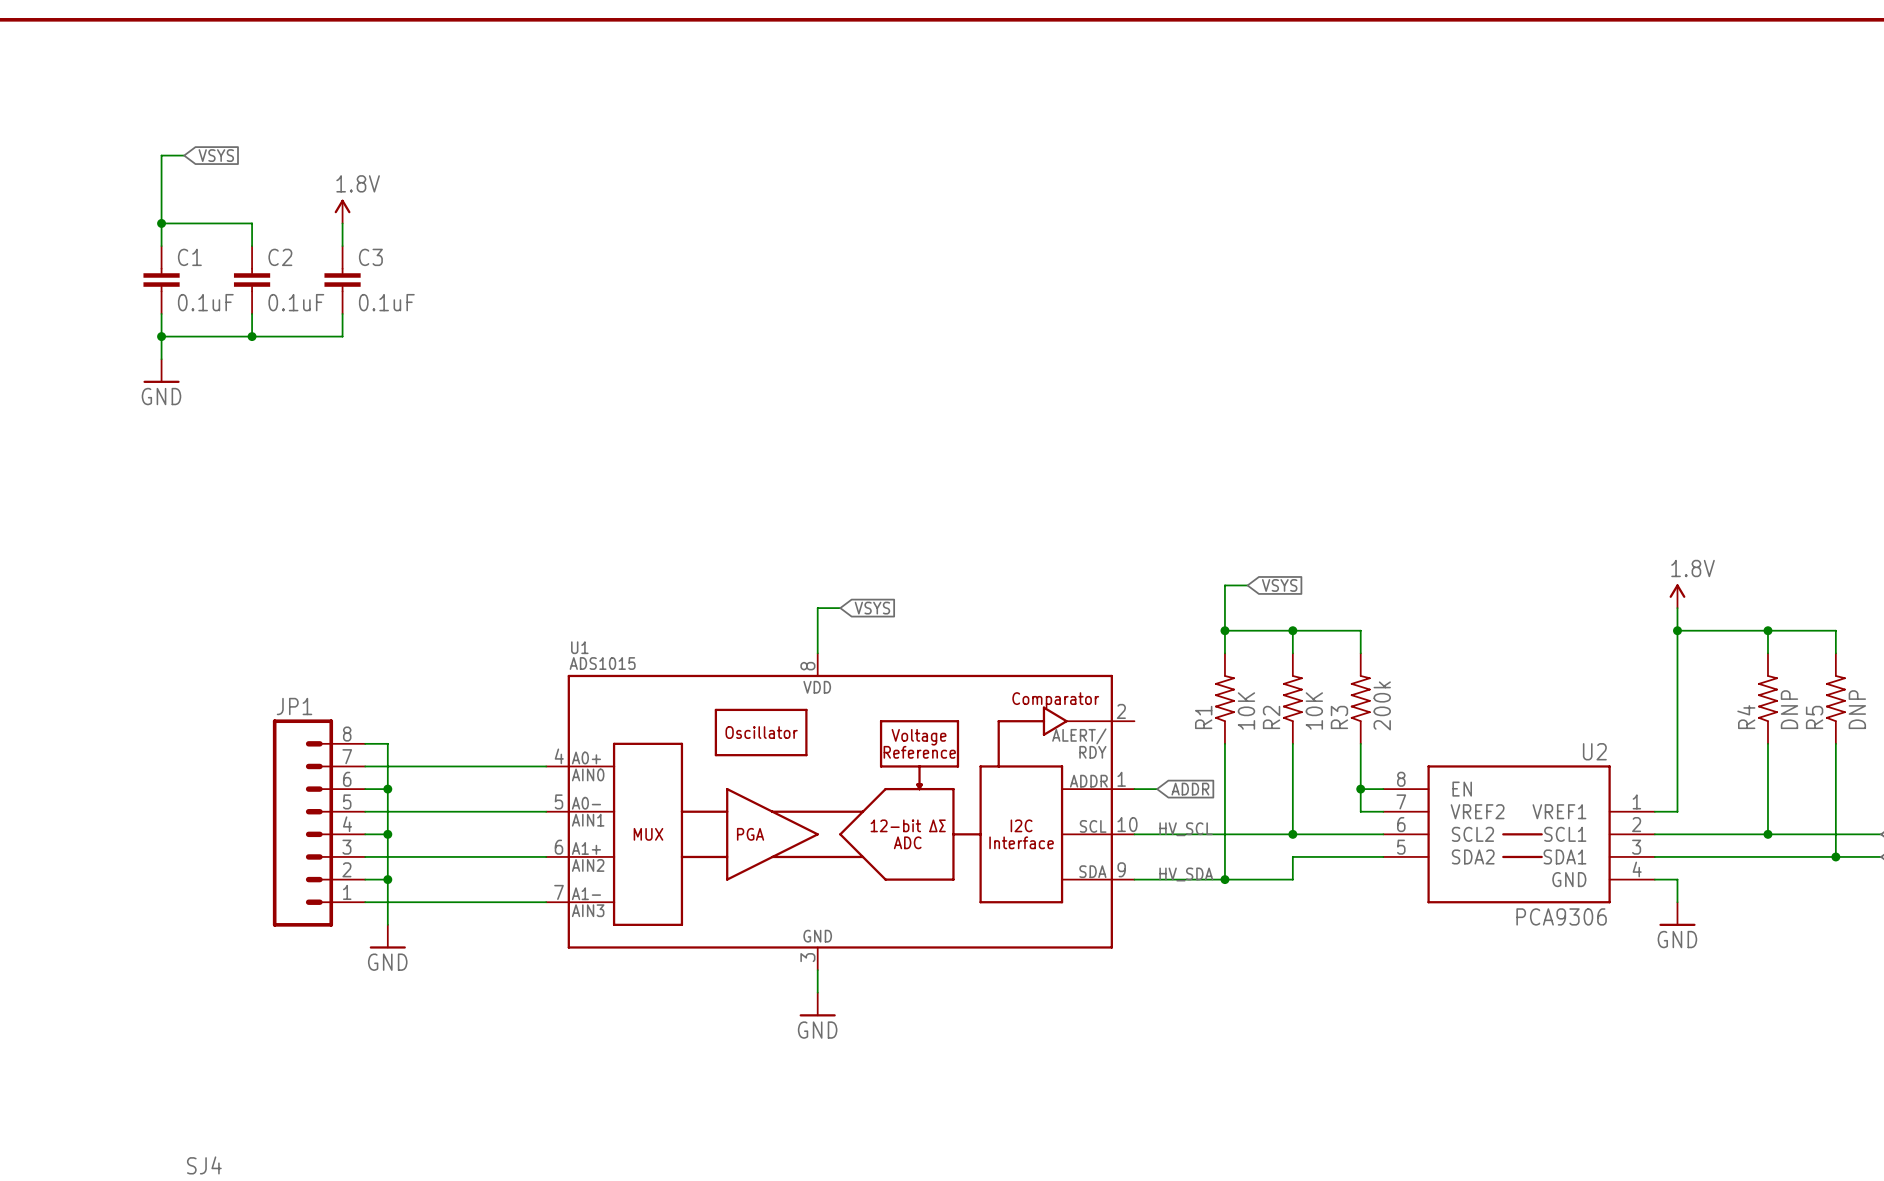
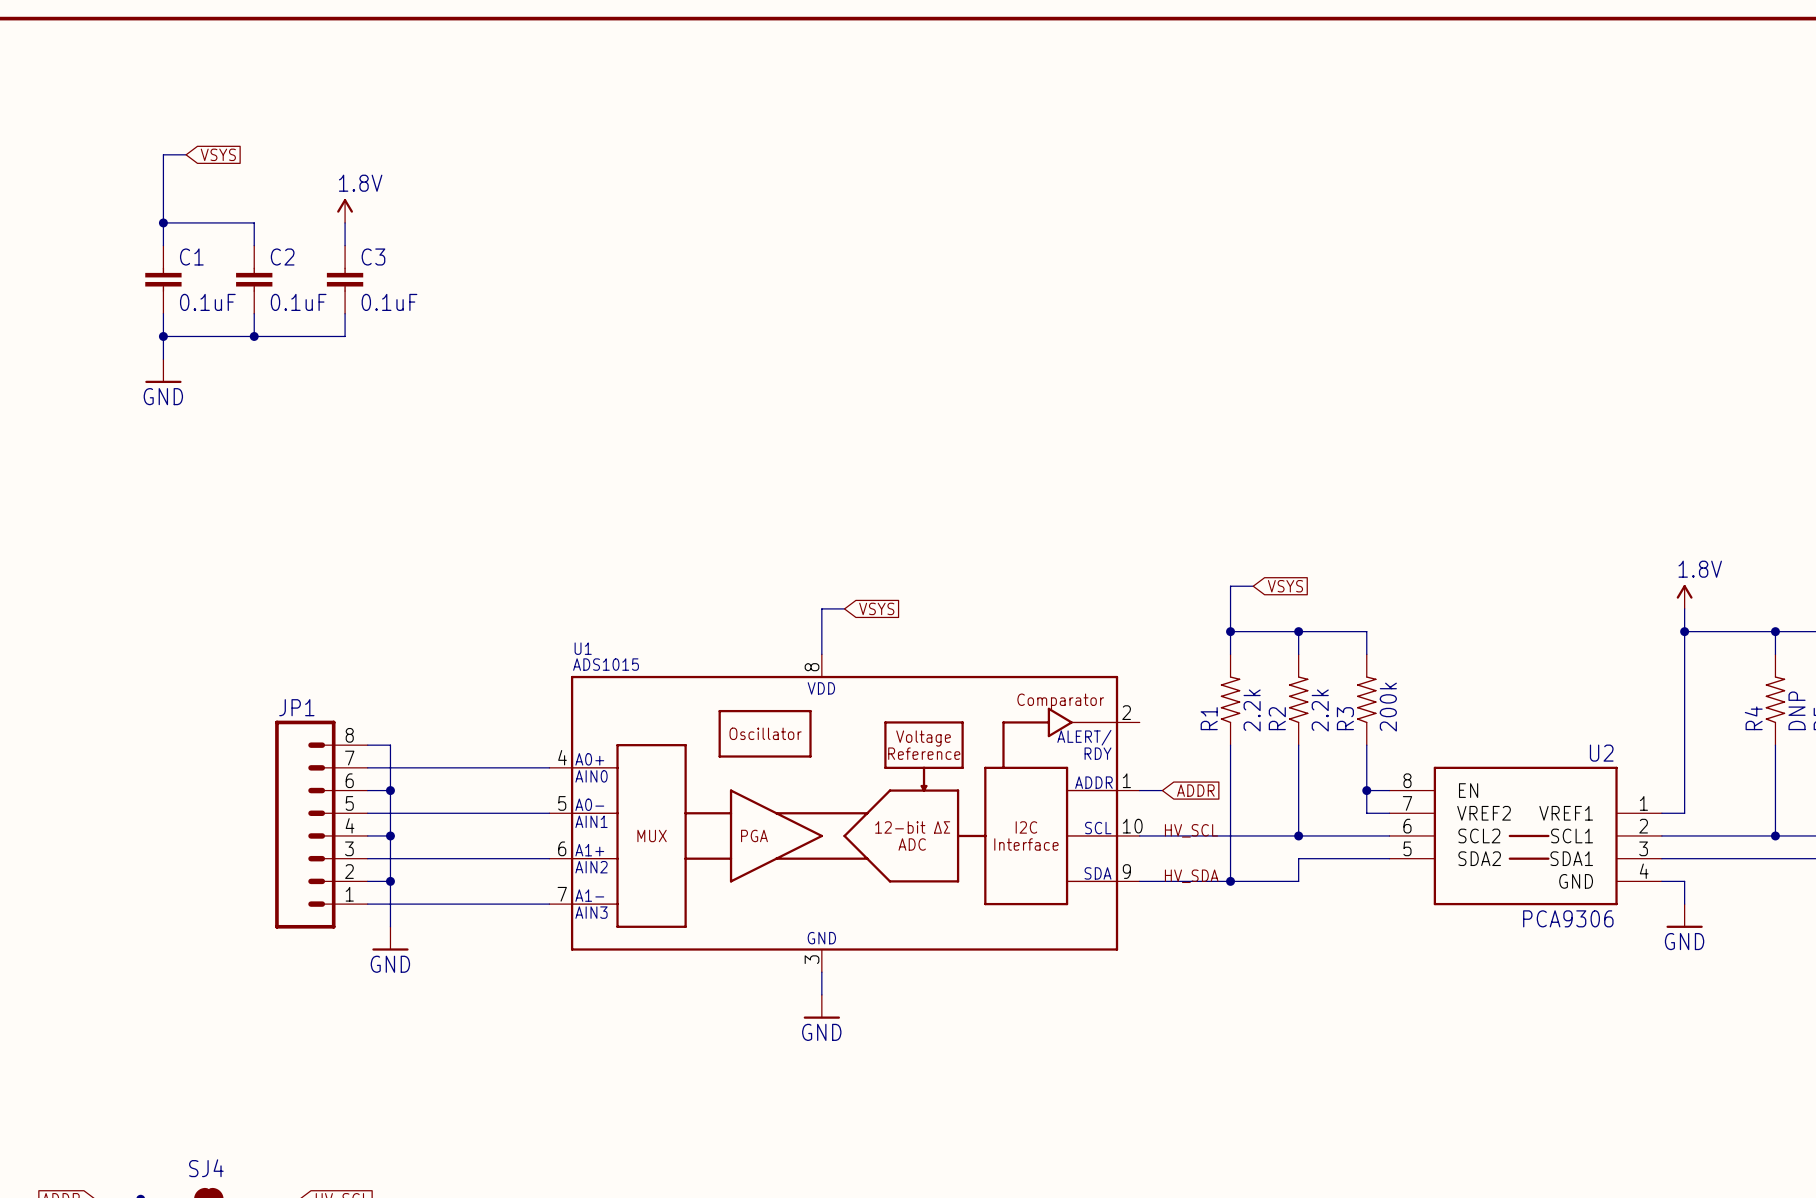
R1 value: 10K (1246, 710) -> 2.2k (1252, 710)
R2 value: 10K (1314, 710) -> 2.2k (1320, 710)

